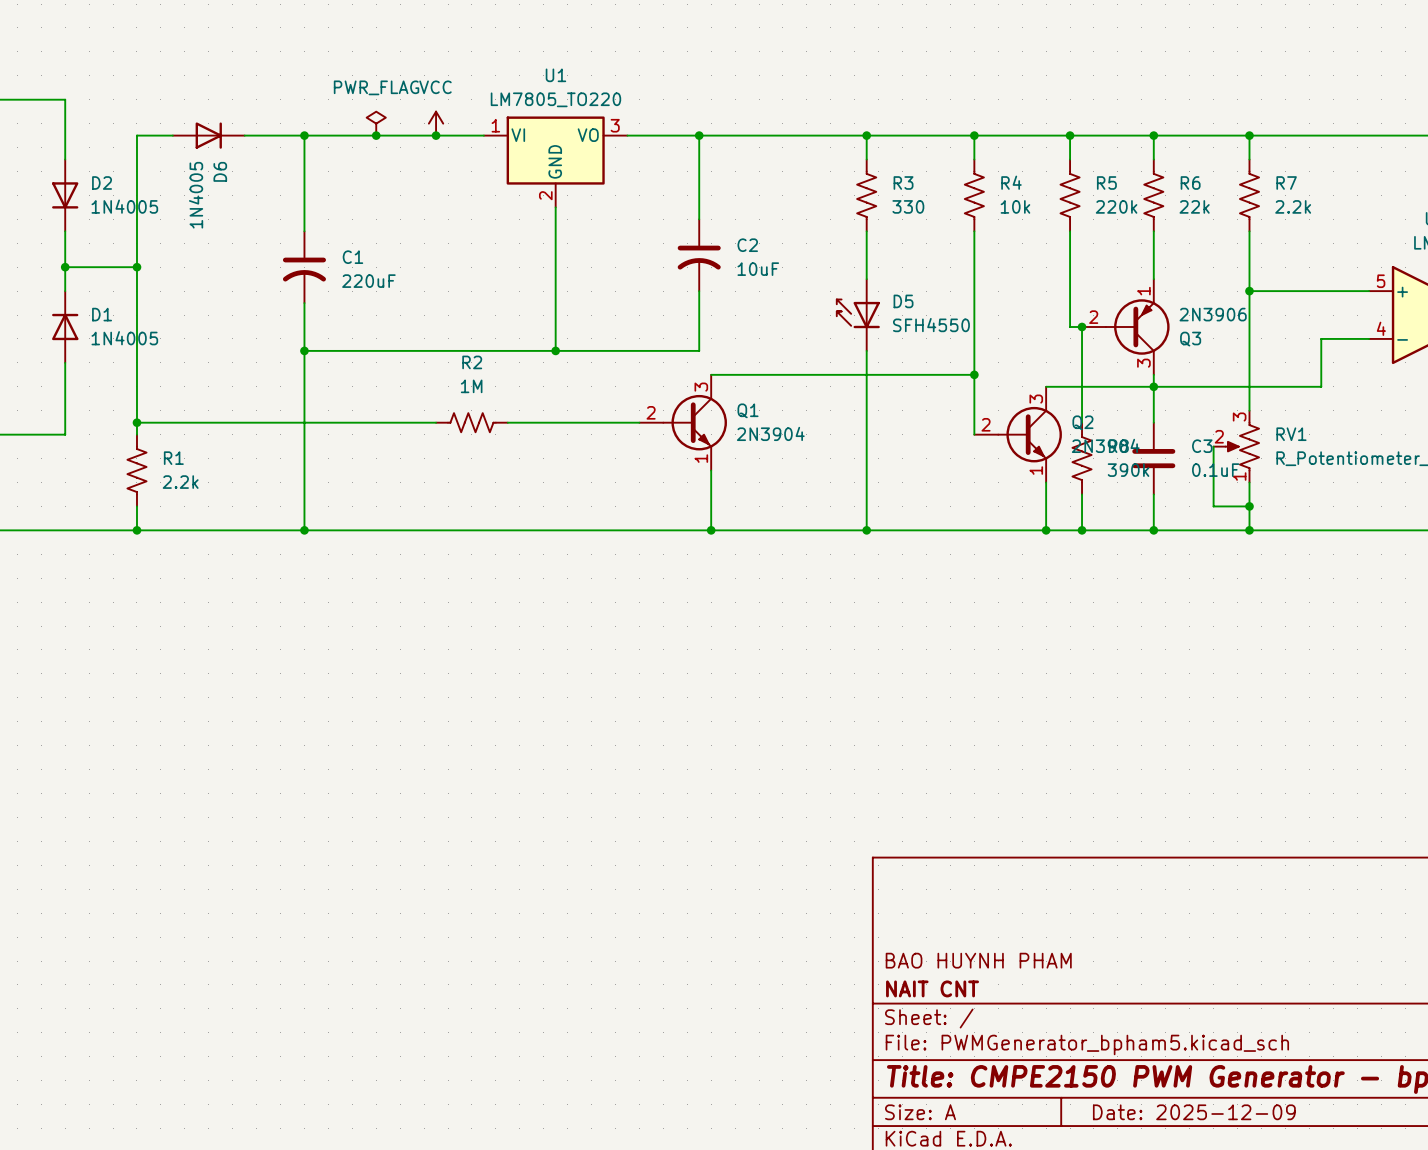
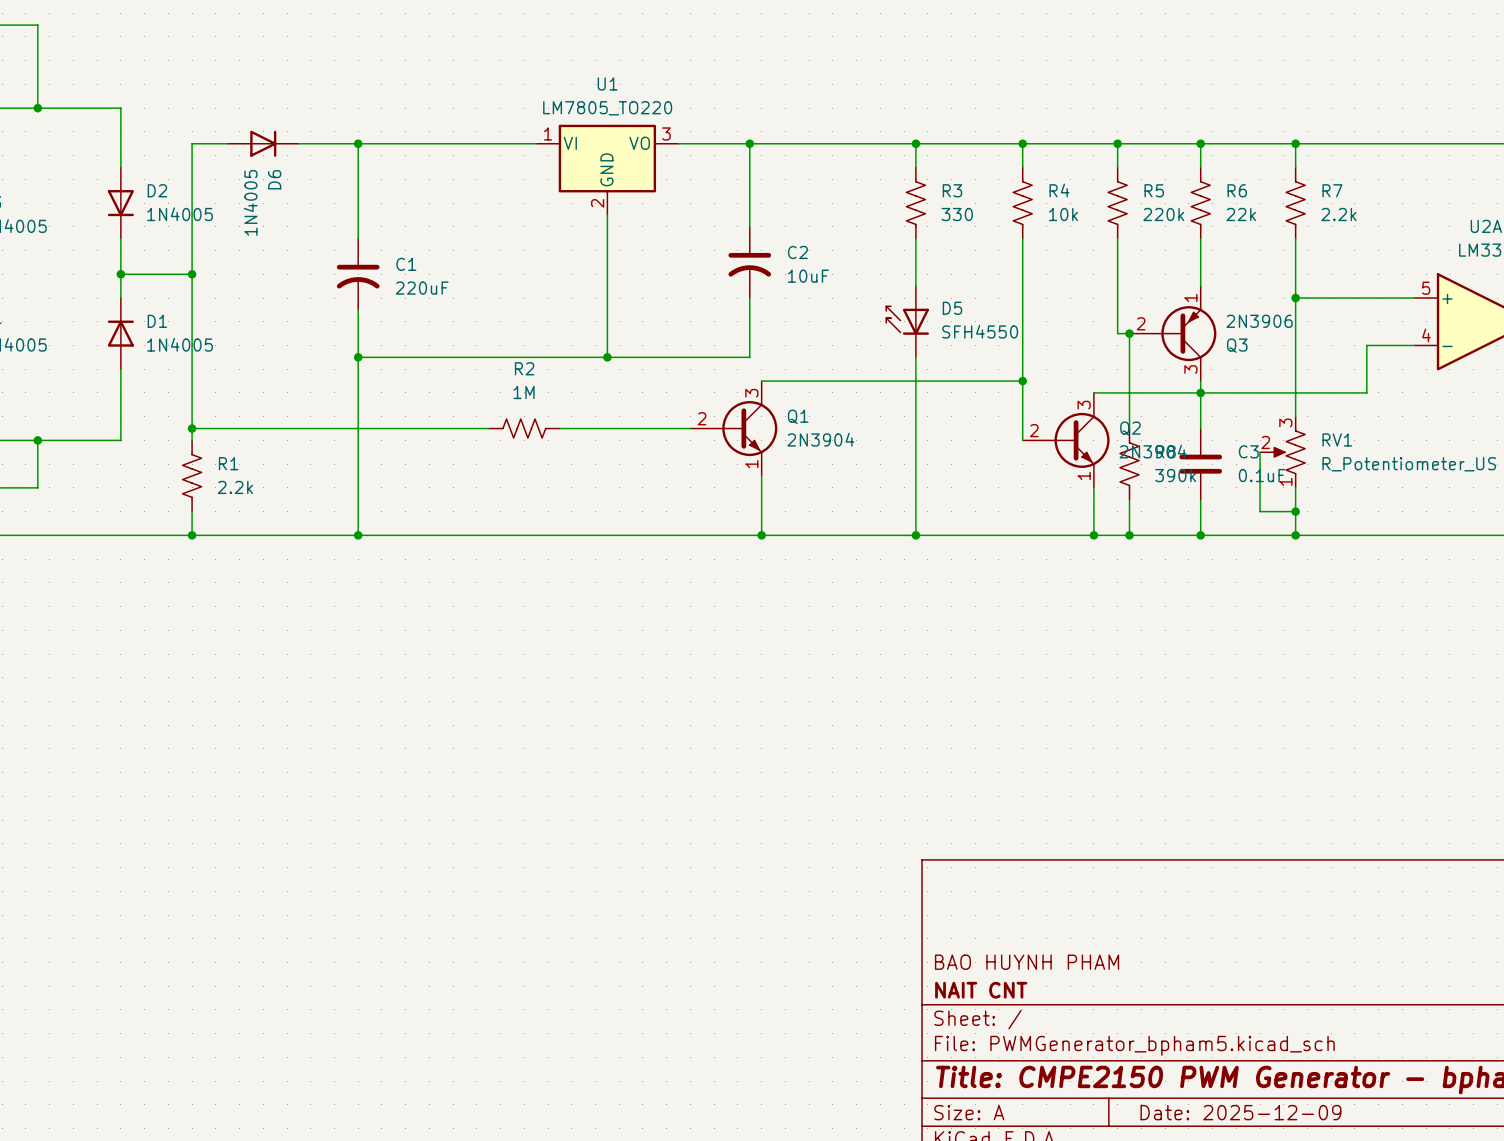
power symbol: PWR_FLAG (376, 123) -> none
power symbol: VCC (436, 123) -> none
junction: (376, 135) -> none
junction: (436, 135) -> none

